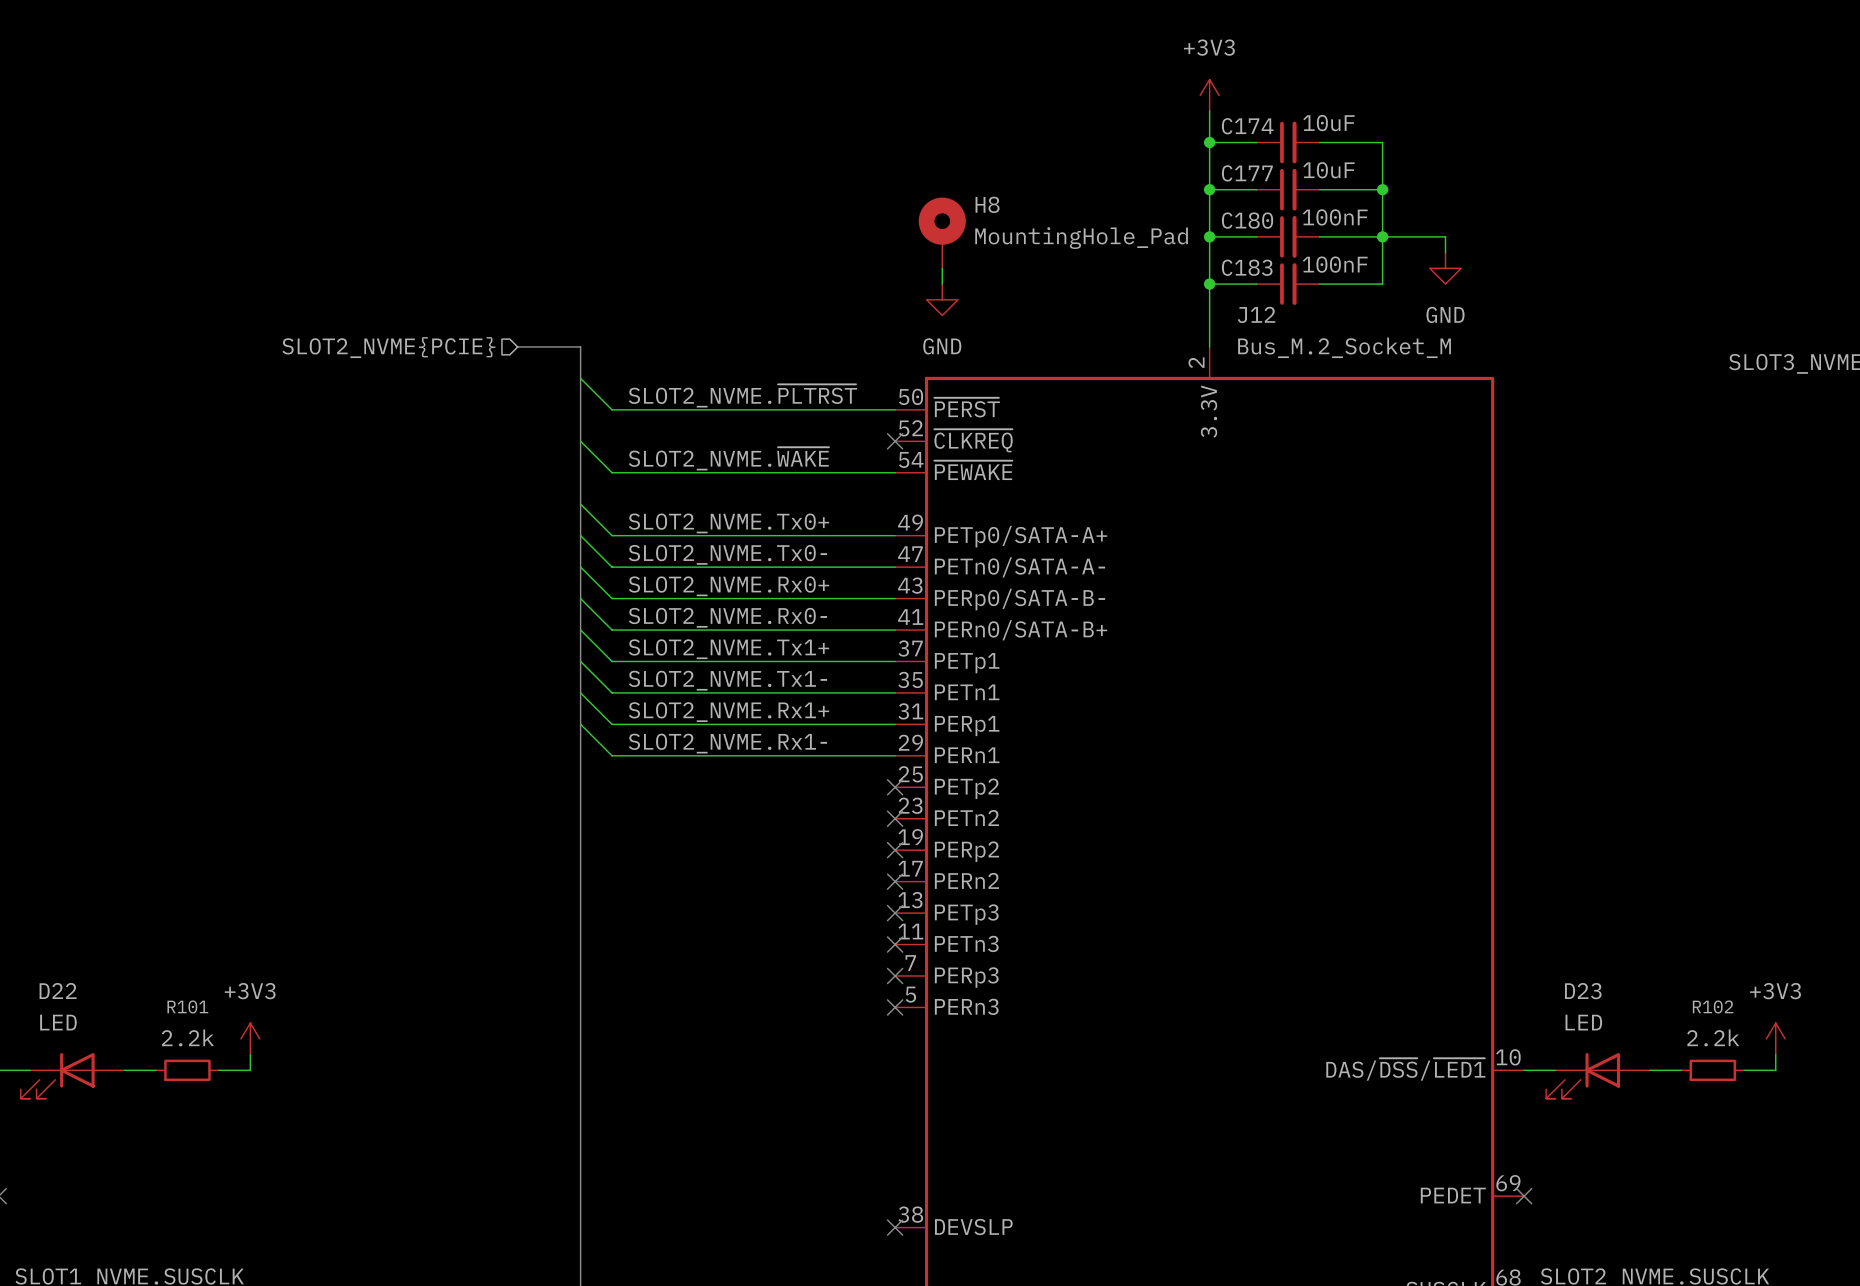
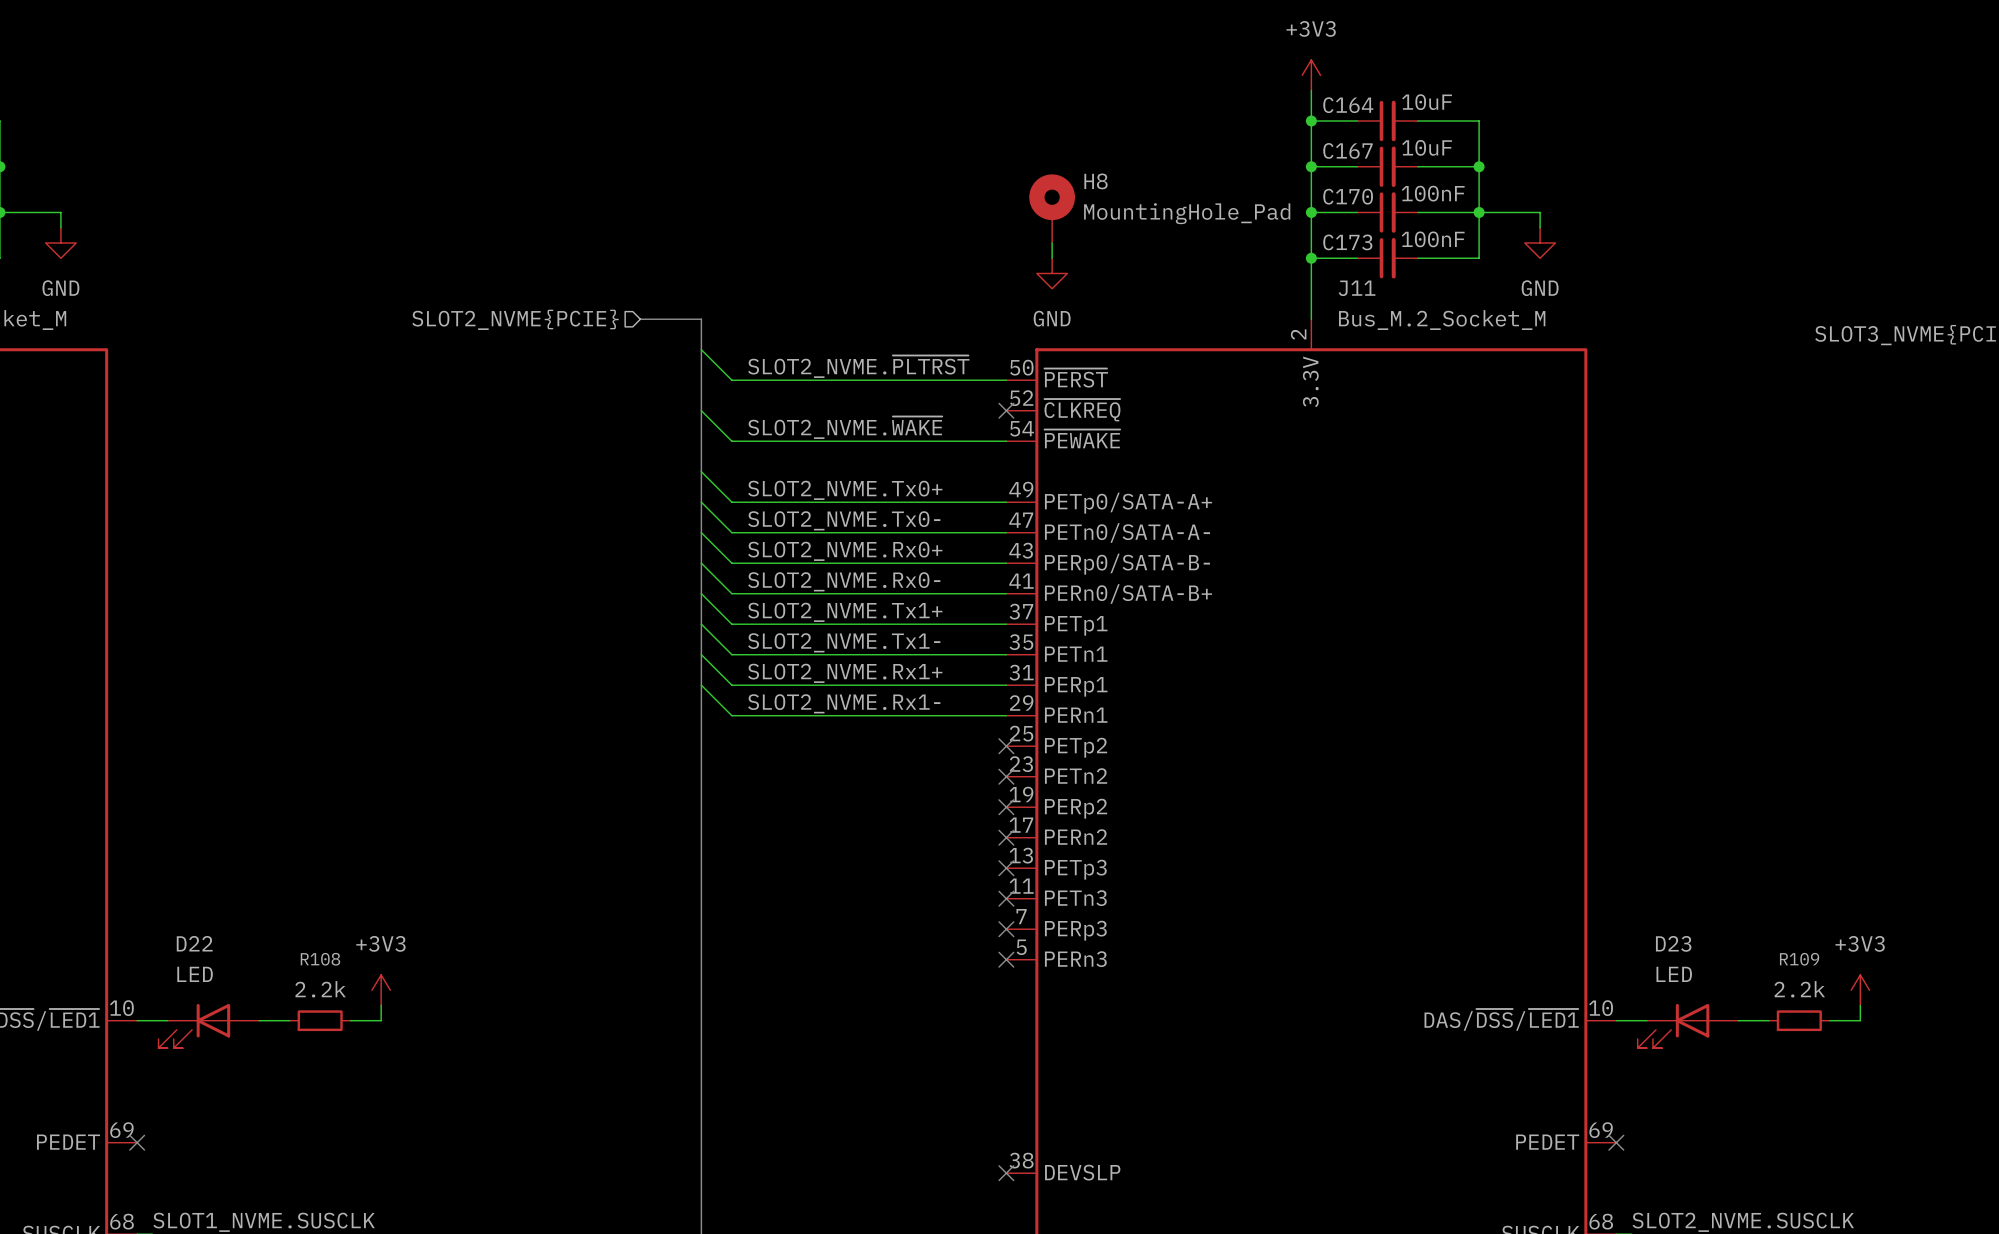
C174 name: C174 (1247, 126) -> C164 (1348, 105)
C177 name: C177 (1247, 173) -> C167 (1347, 150)
C180 name: C180 (1247, 220) -> C170 (1348, 196)
C183 name: C183 (1247, 267) -> C173 (1347, 242)
J12 name: J12 (1256, 314) -> J11 (1357, 288)
R101 name: R101 (187, 1006) -> R108 (320, 959)
R102 name: R102 (1713, 1006) -> R109 (1799, 959)

